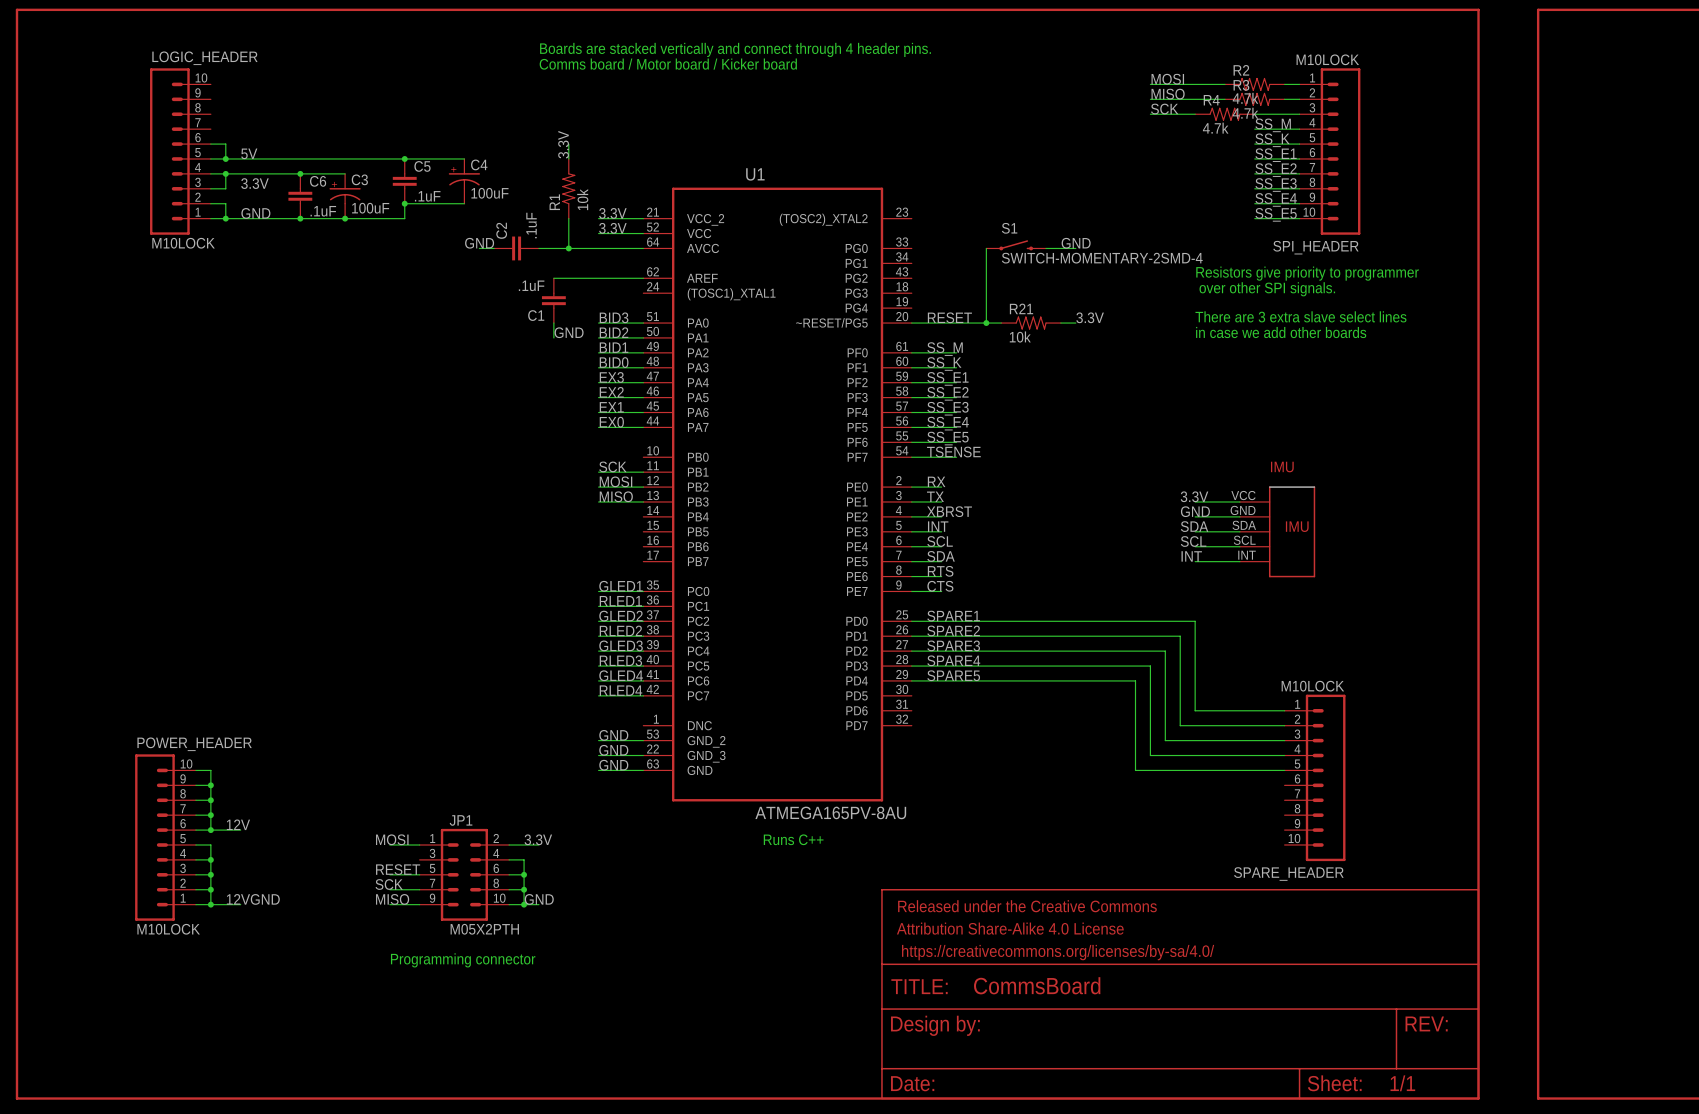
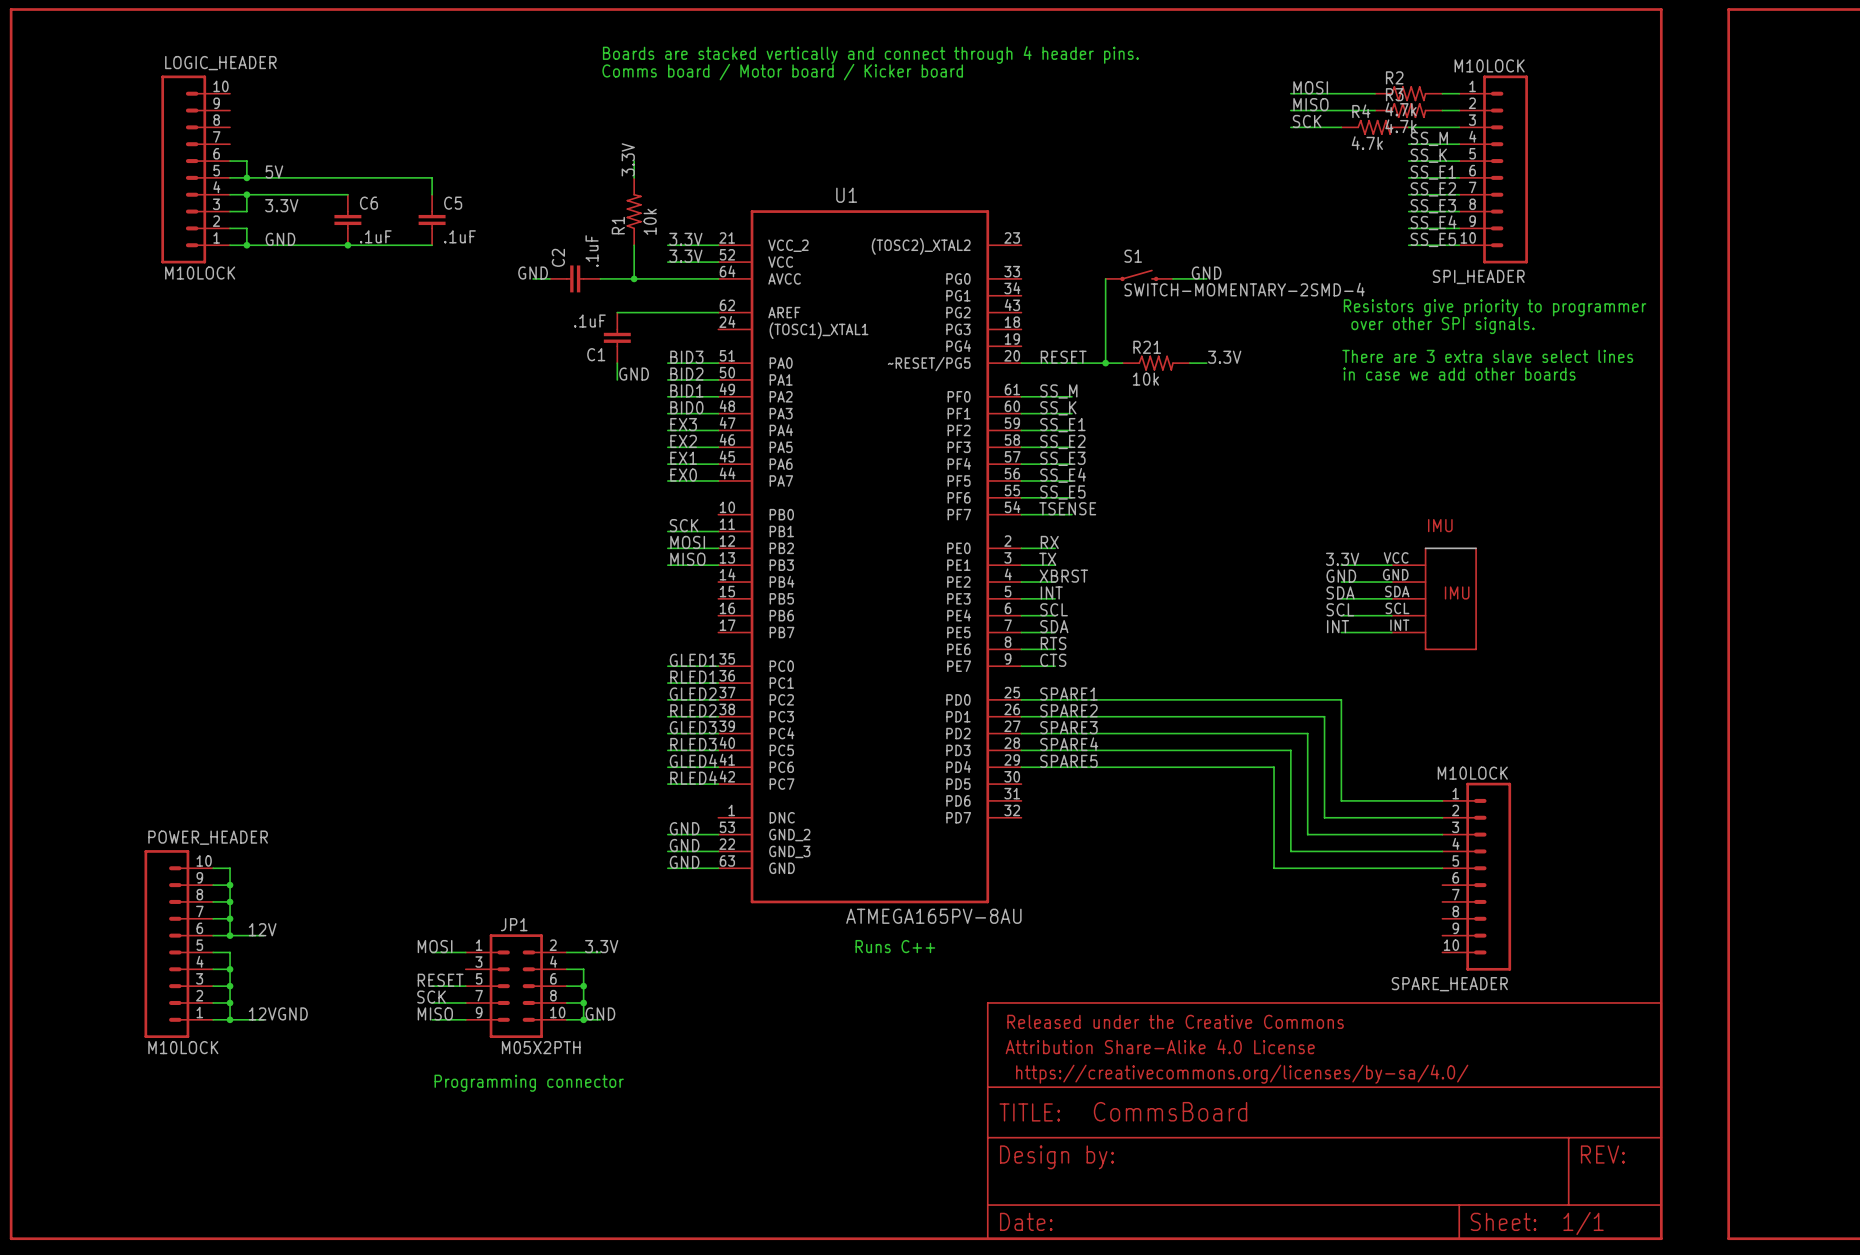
wire: (389, 158) (464, 158) -> (432, 177) (432, 194)
junction: (404, 158) -> none
junction: (300, 173) -> none
wire: (315, 173) (345, 173) -> none
C5 position: (404, 181) -> (432, 219)
C4: 100uF (464, 181) -> none
C6 position: (300, 196) -> (347, 219)
C3: 100uF (345, 196) -> none
junction: (404, 203) -> none
wire: (464, 203) (404, 203) (404, 218) (389, 218) -> none
junction: (300, 218) -> none
junction: none -> (347, 245)
junction: (345, 218) -> none

